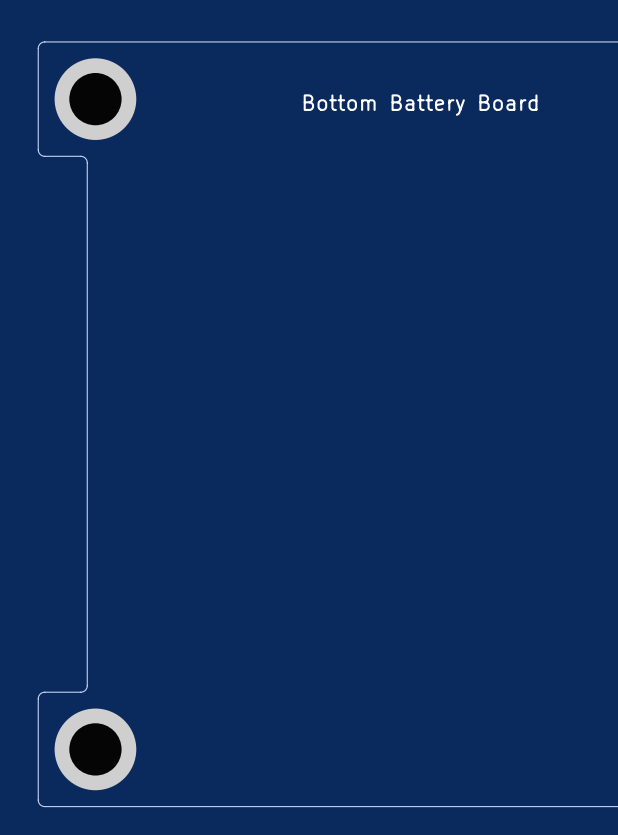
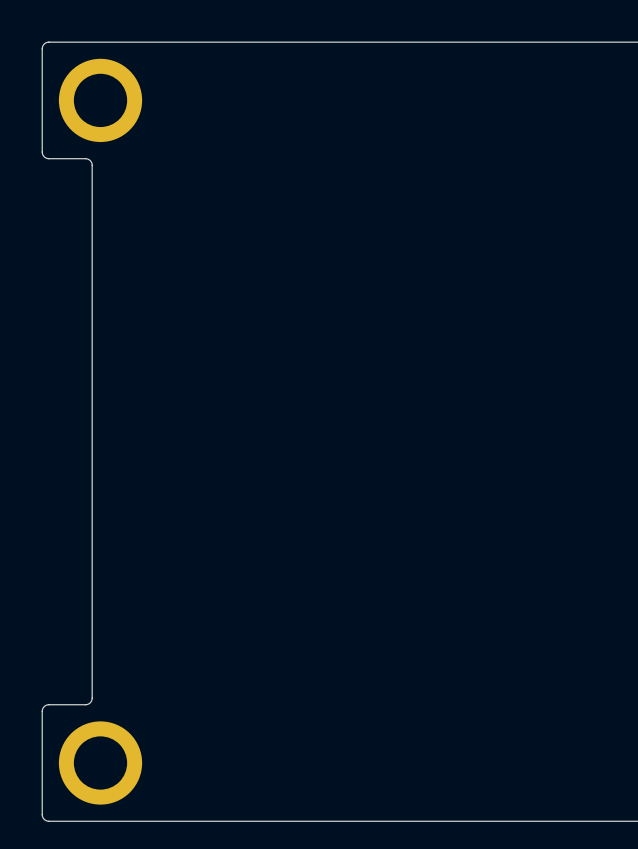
text: Bottom Battery Board (420, 105) -> none

